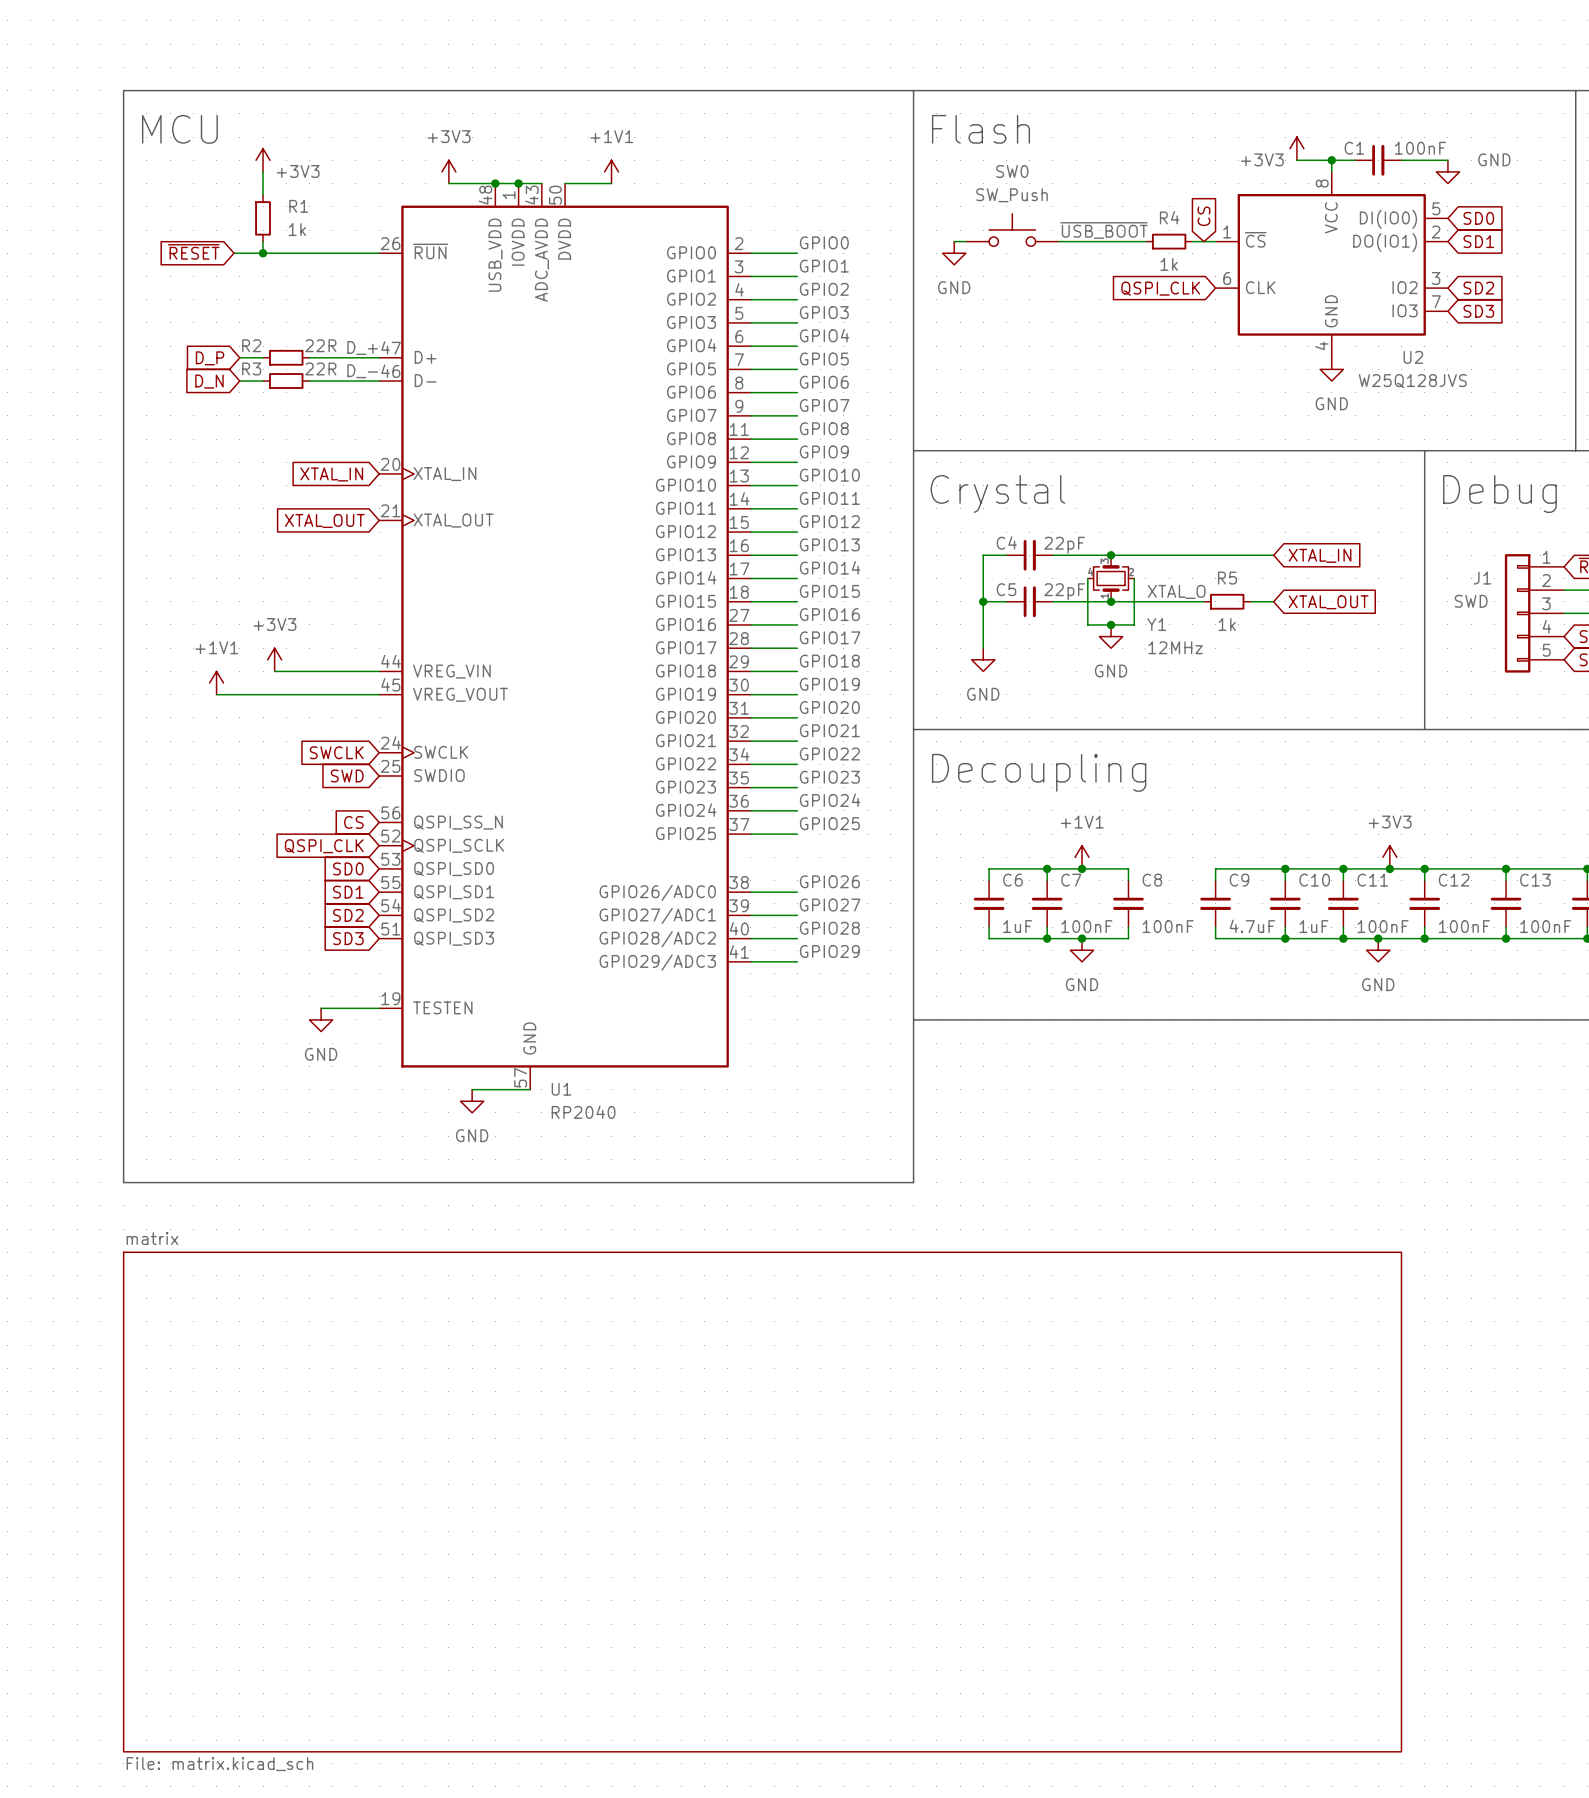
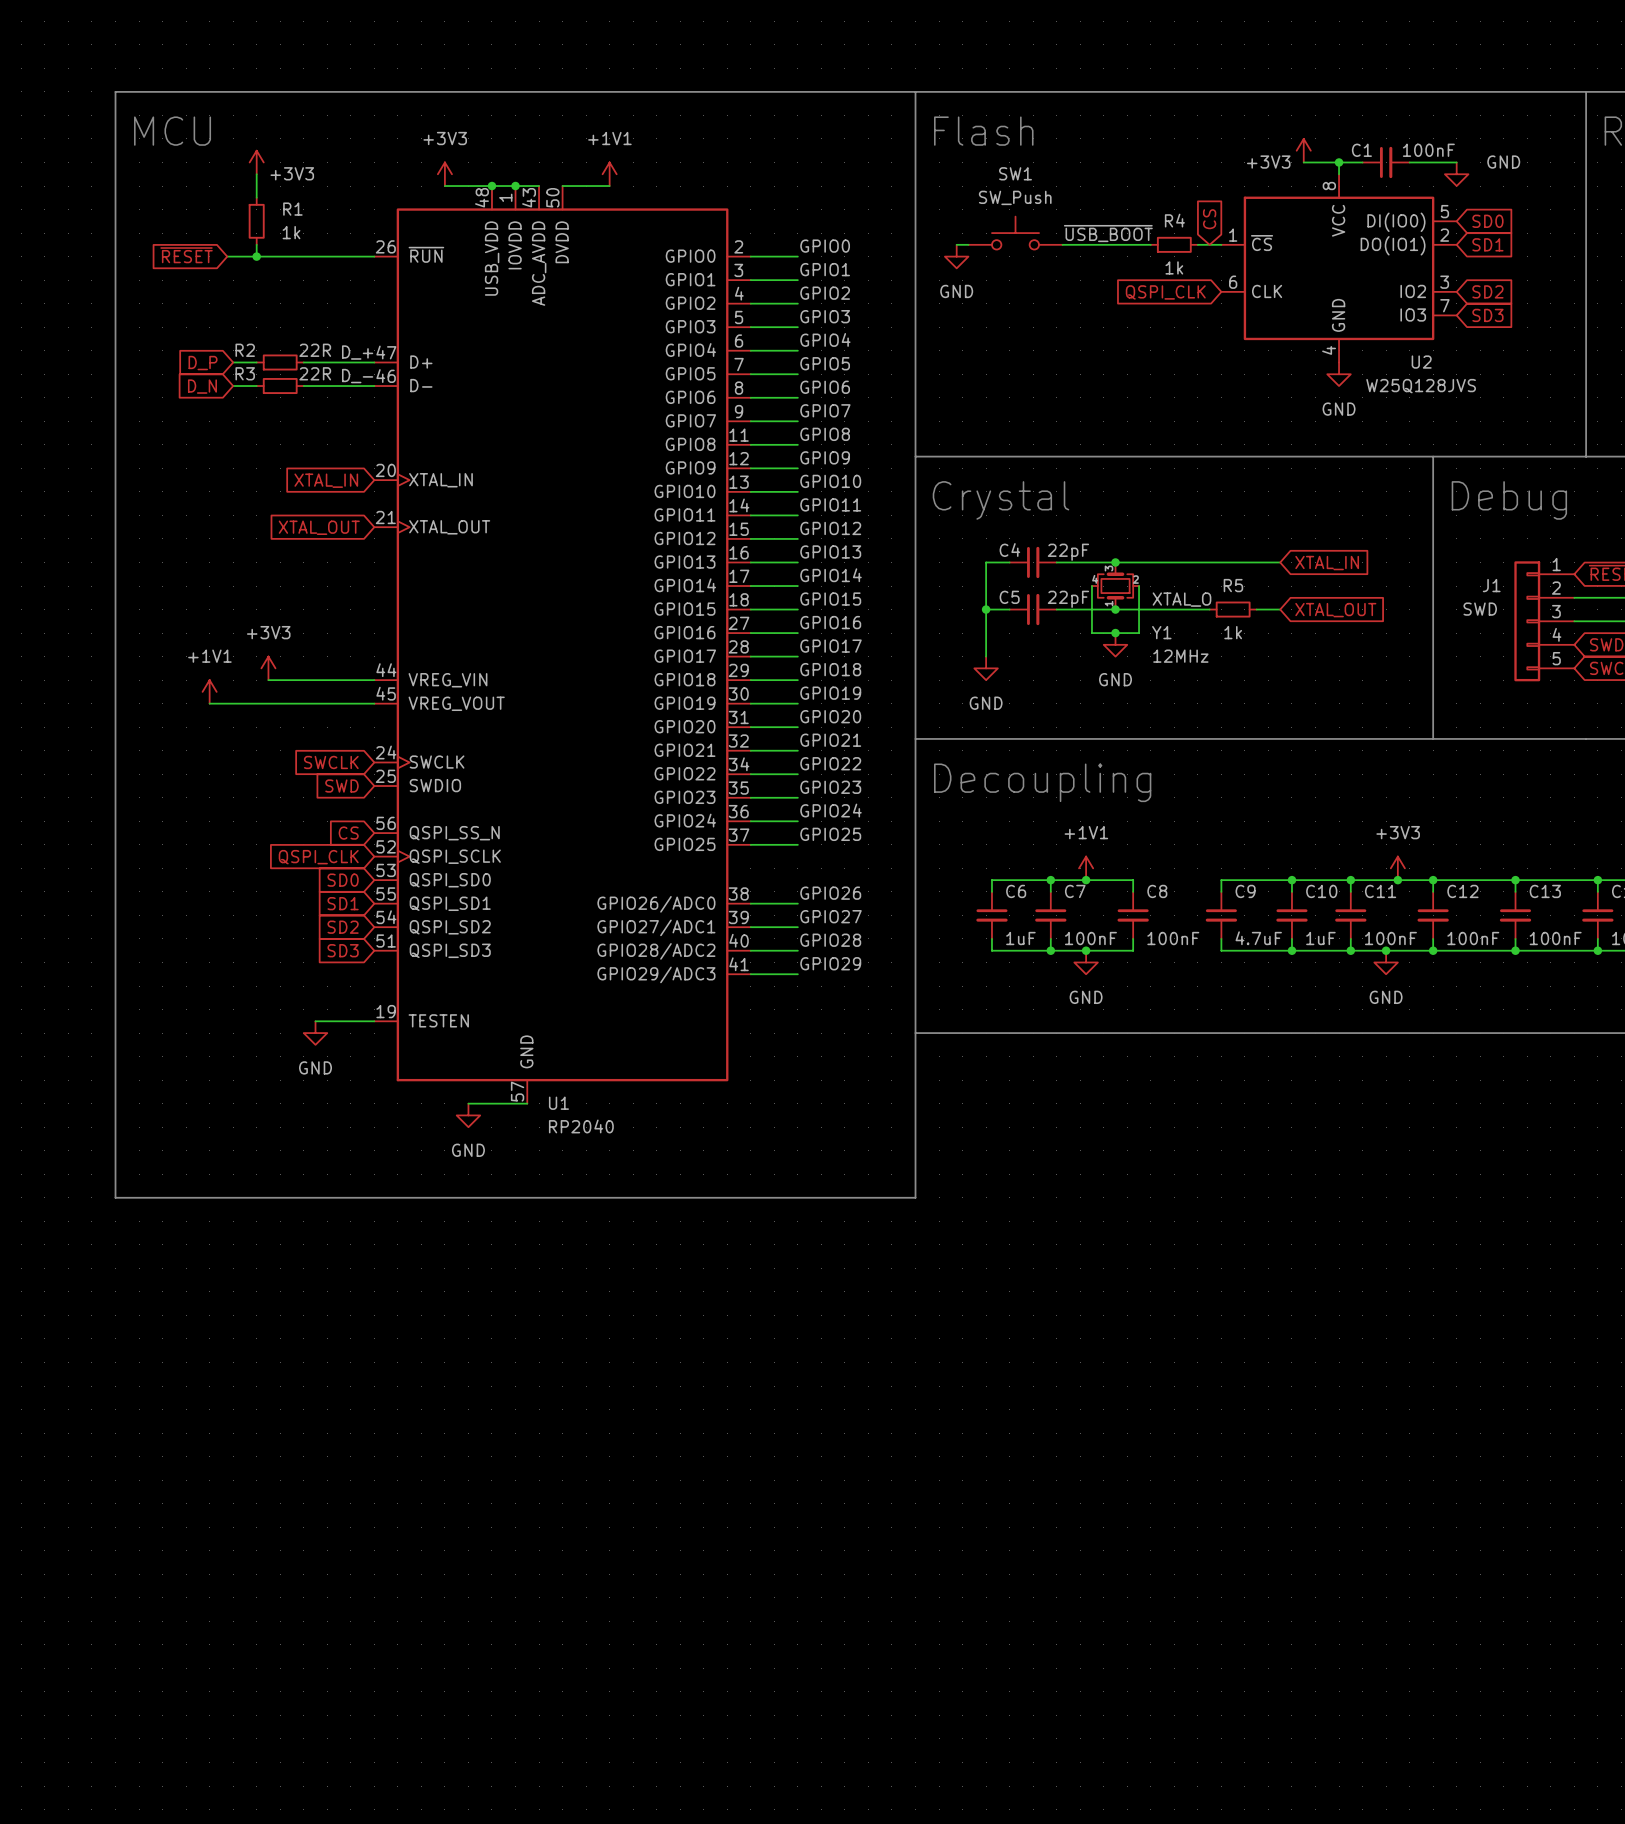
SW0 name: SW0 (1012, 171) -> SW1 (1015, 173)
sheet matrix: File: matrix.kicad_sch (762, 1502) -> none

